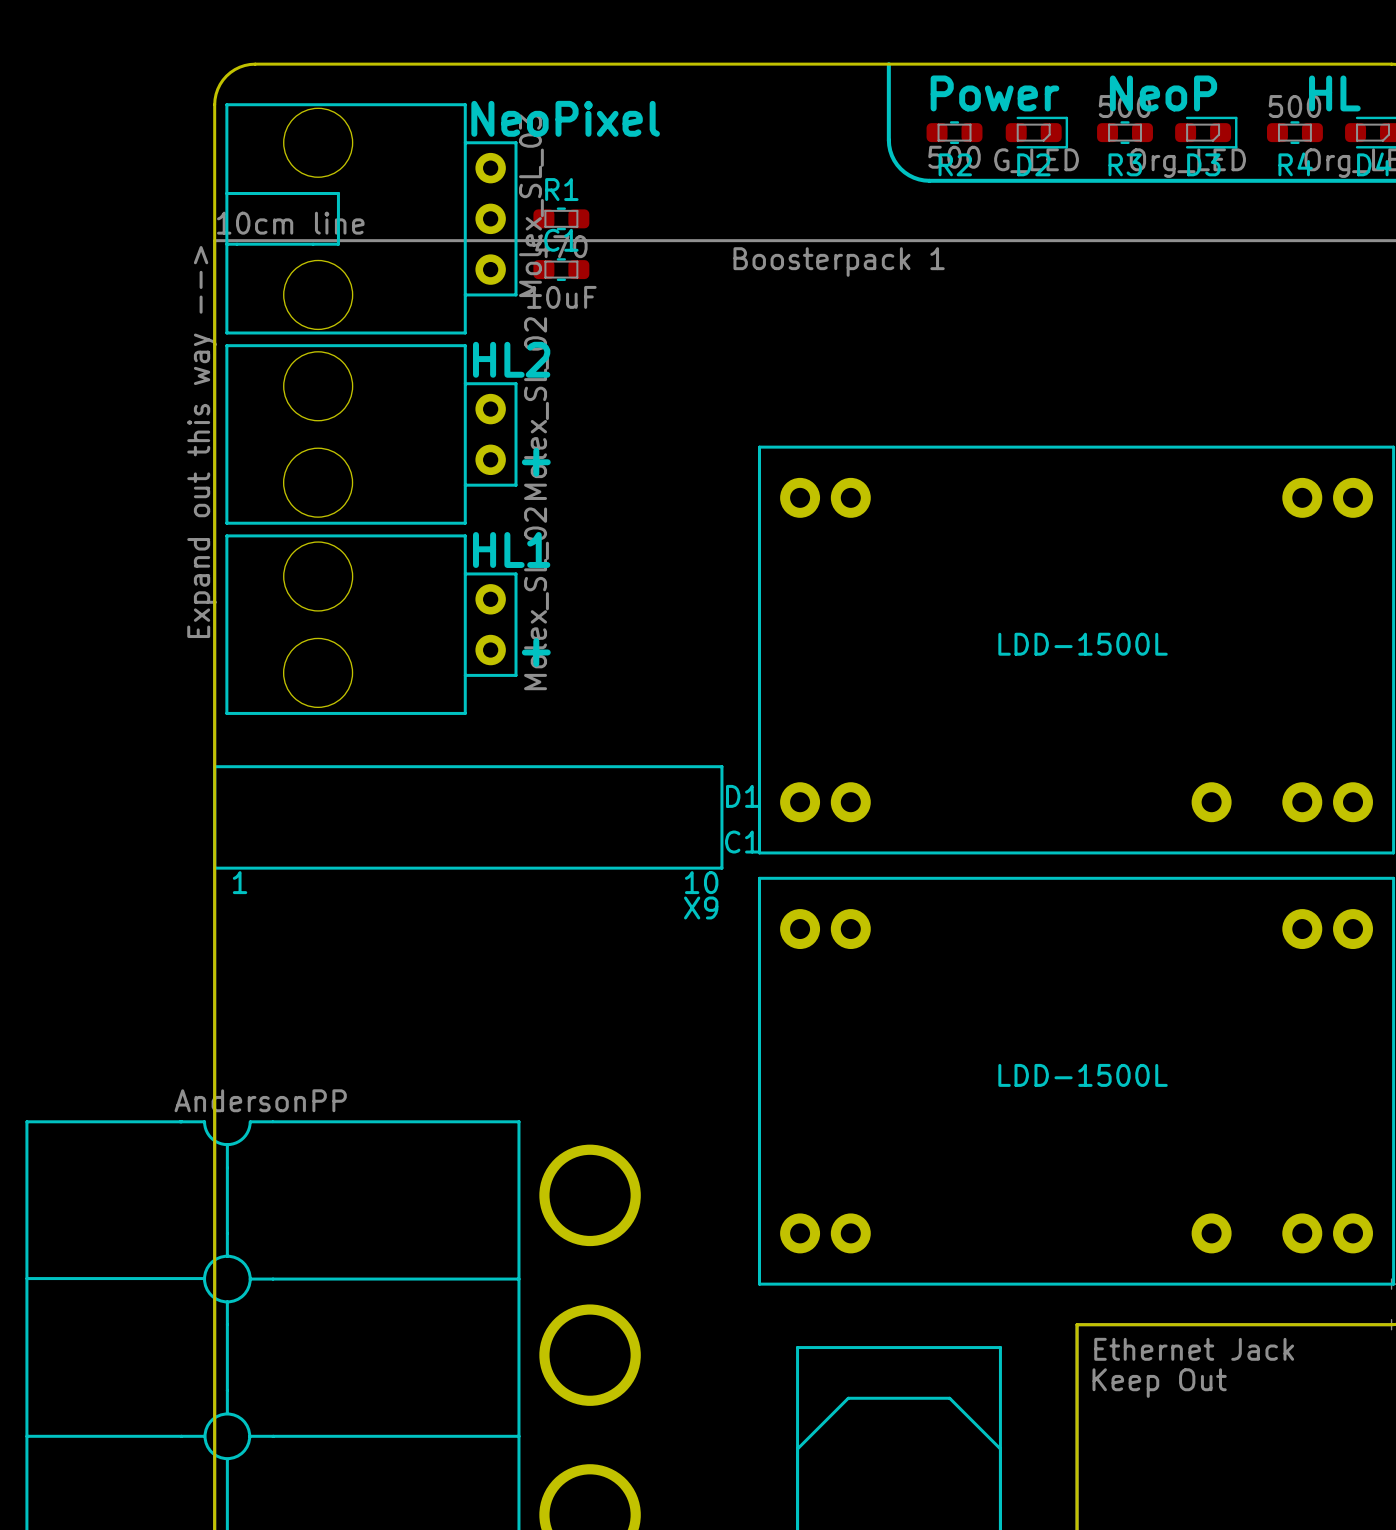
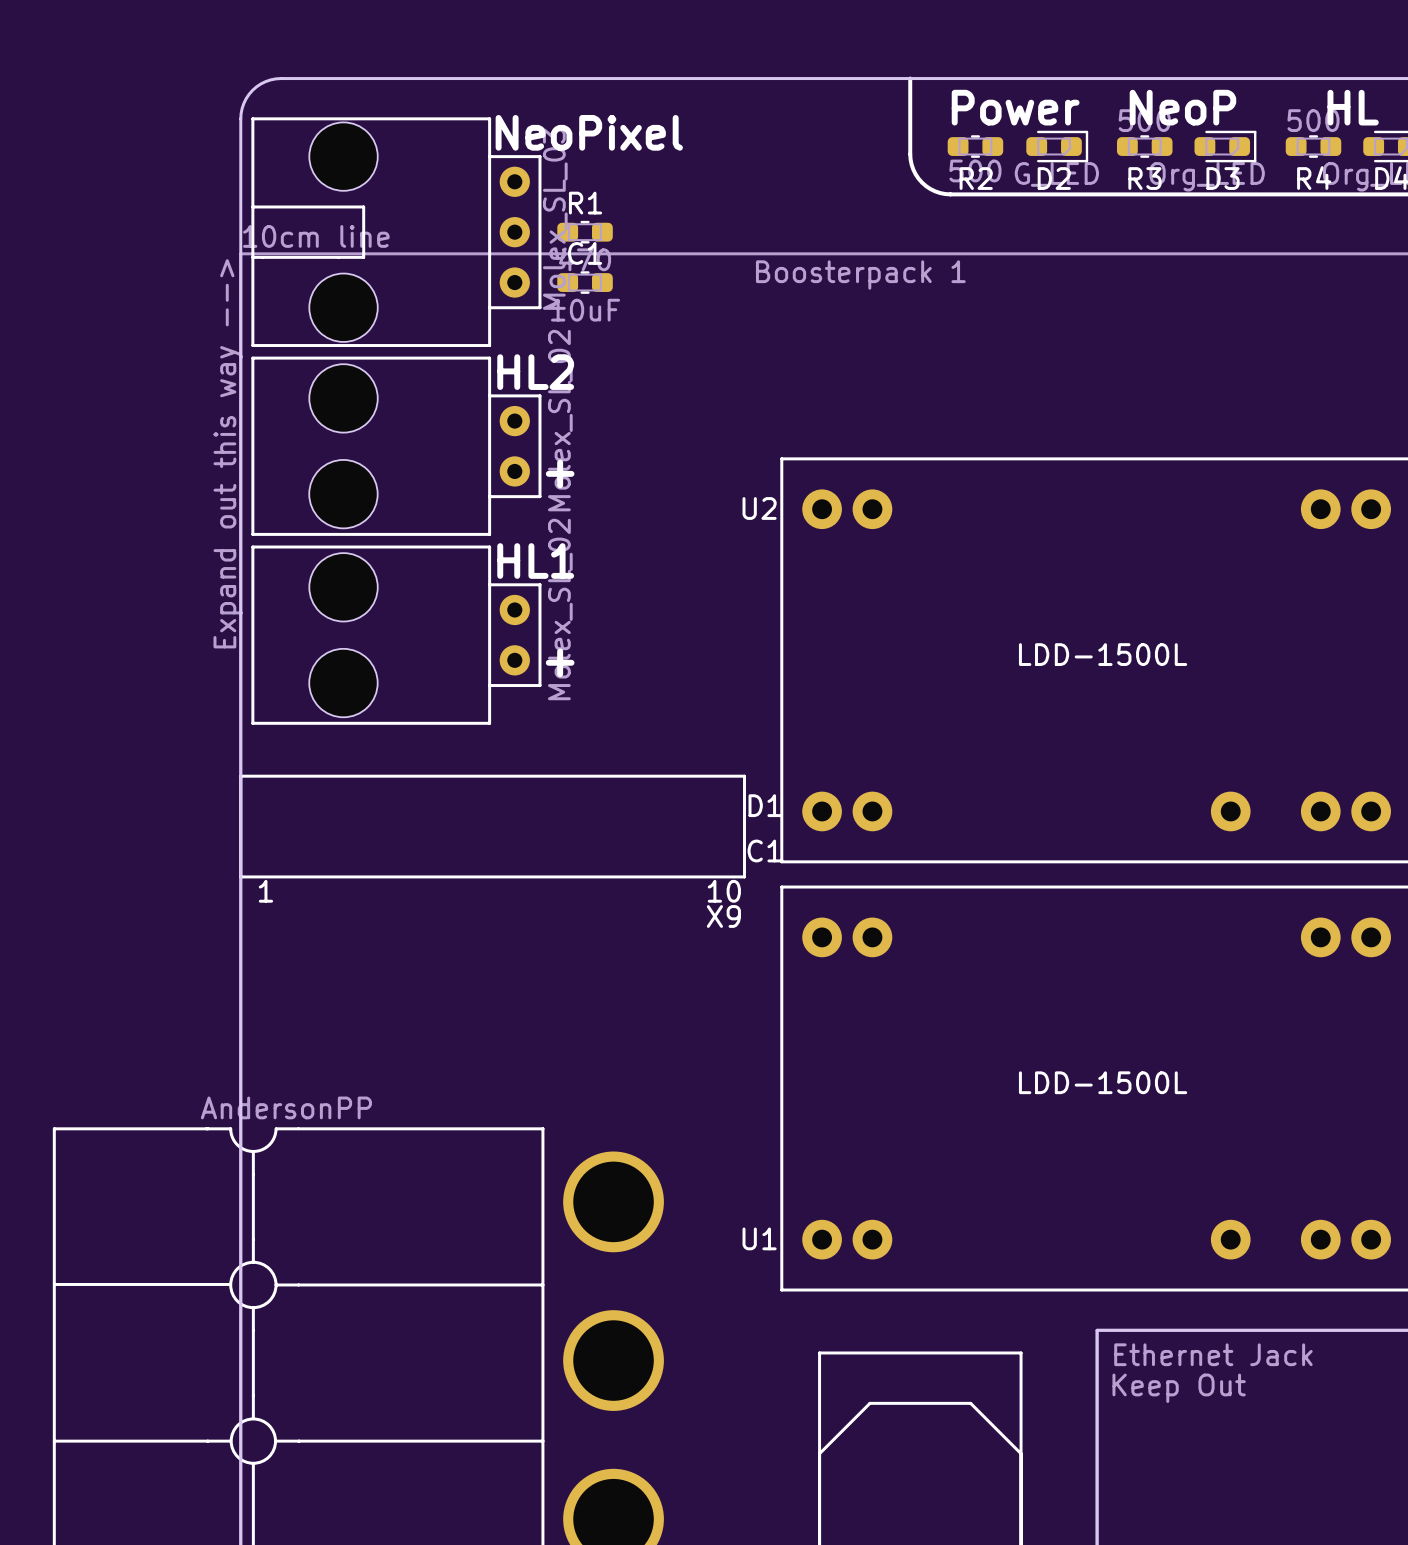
U2 name: none -> U2 (759, 508)
U1 name: none -> U1 (759, 1238)

